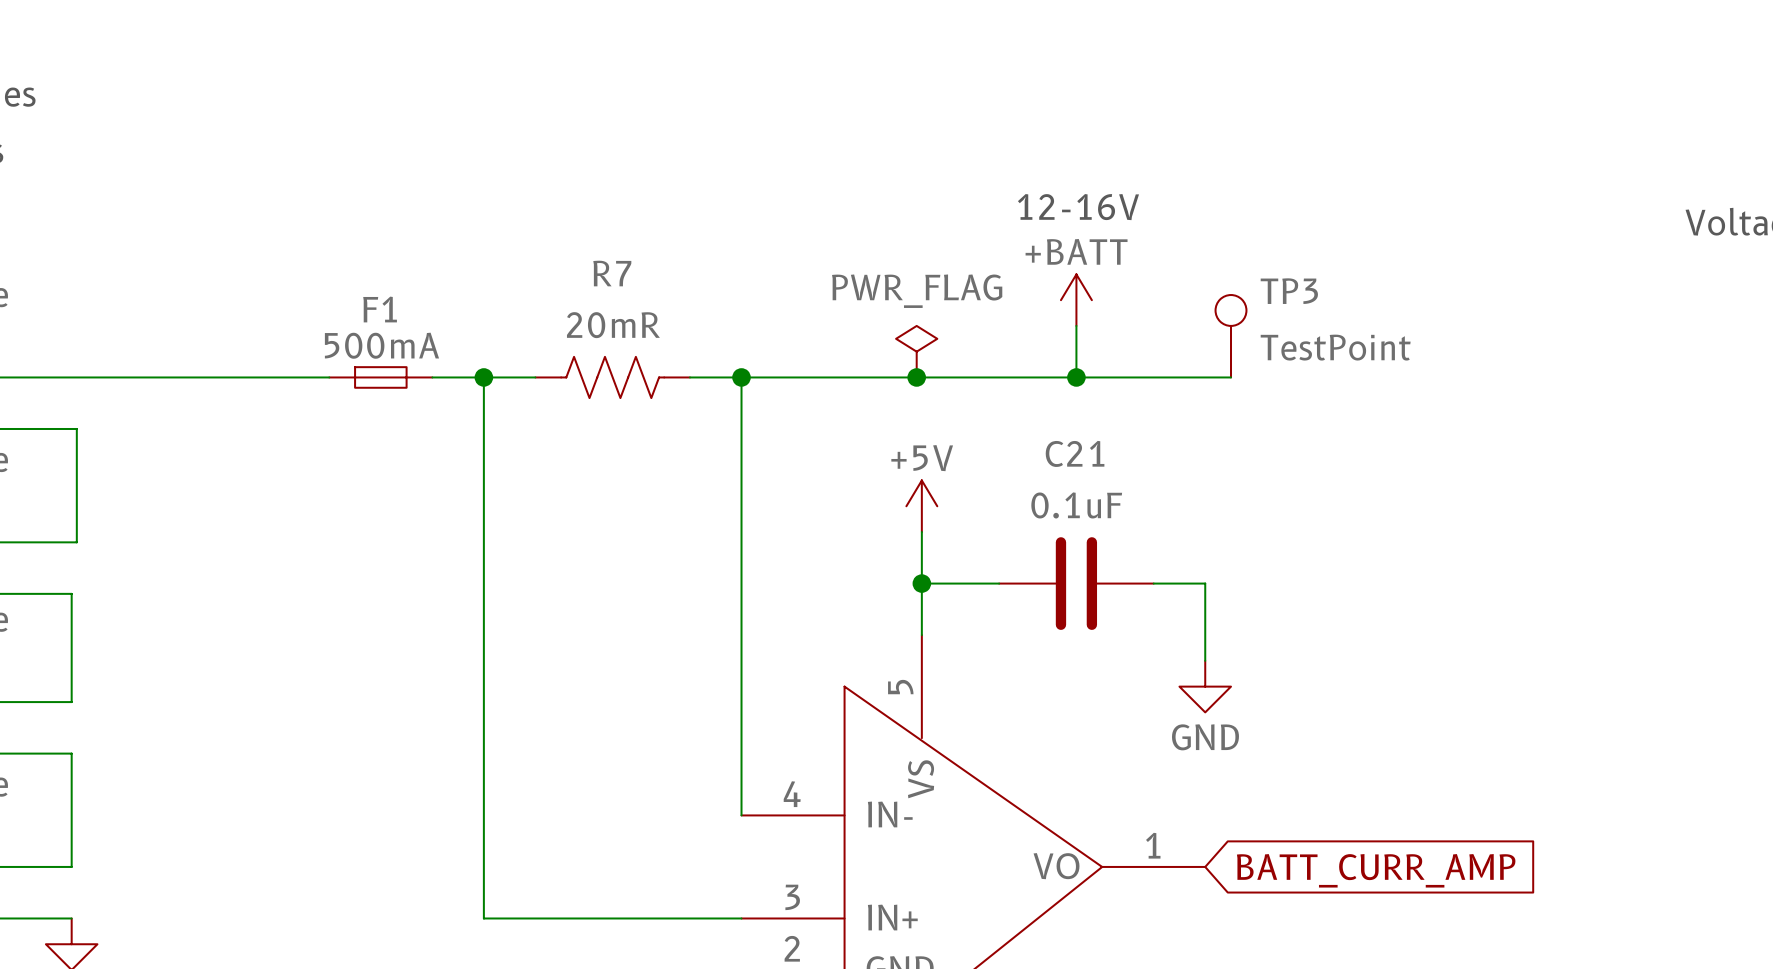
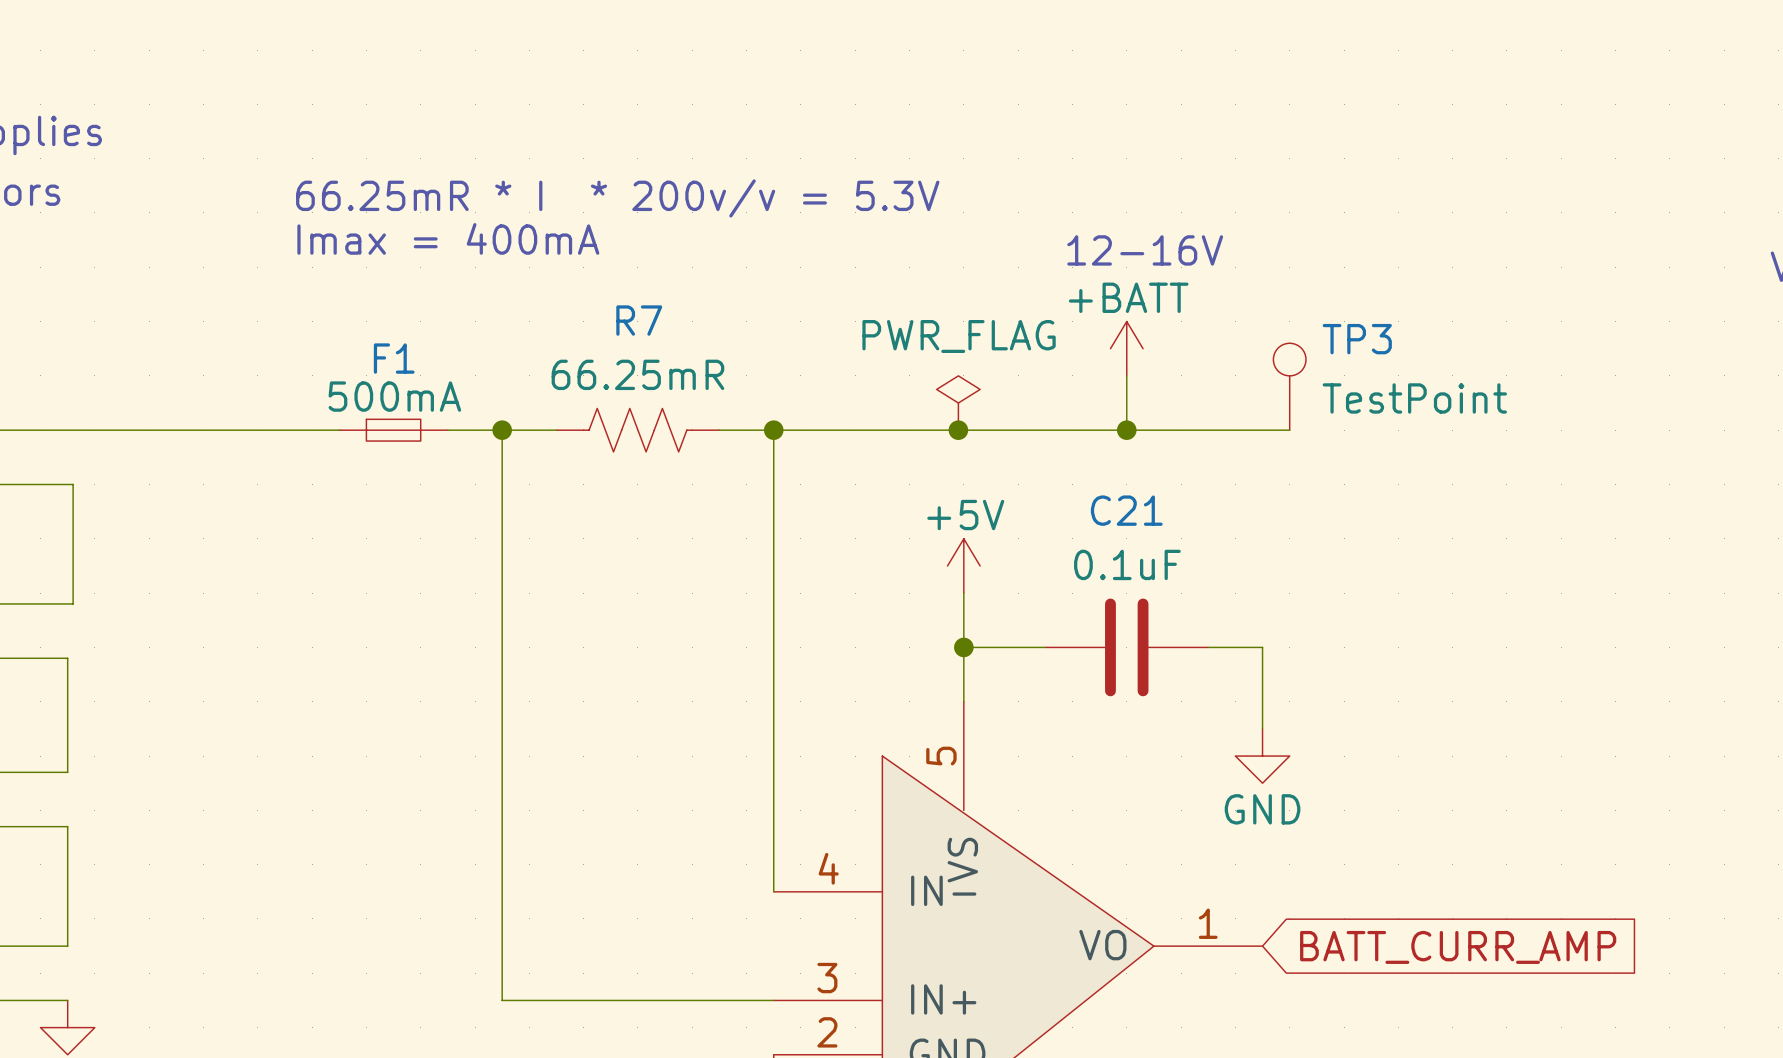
text: none -> 66.25mR * I * 200v/v = 5.3V (617, 198)
text: none -> Imax = 400mA (448, 238)
R7 value: 20mR (613, 325) -> 66.25mR (637, 374)

